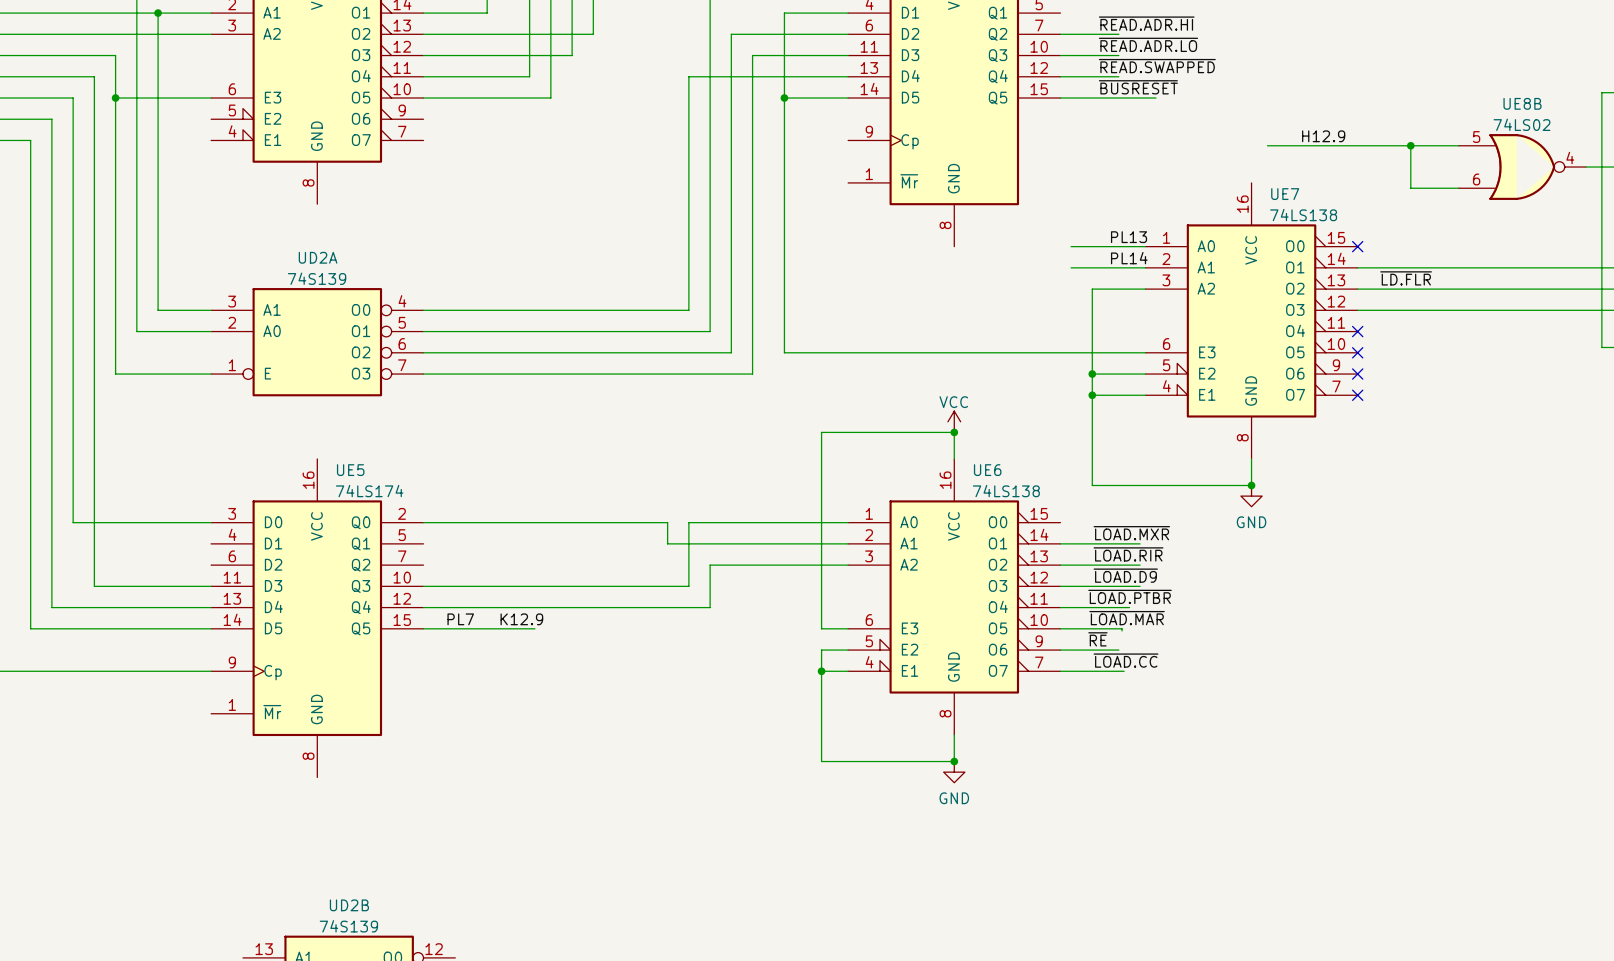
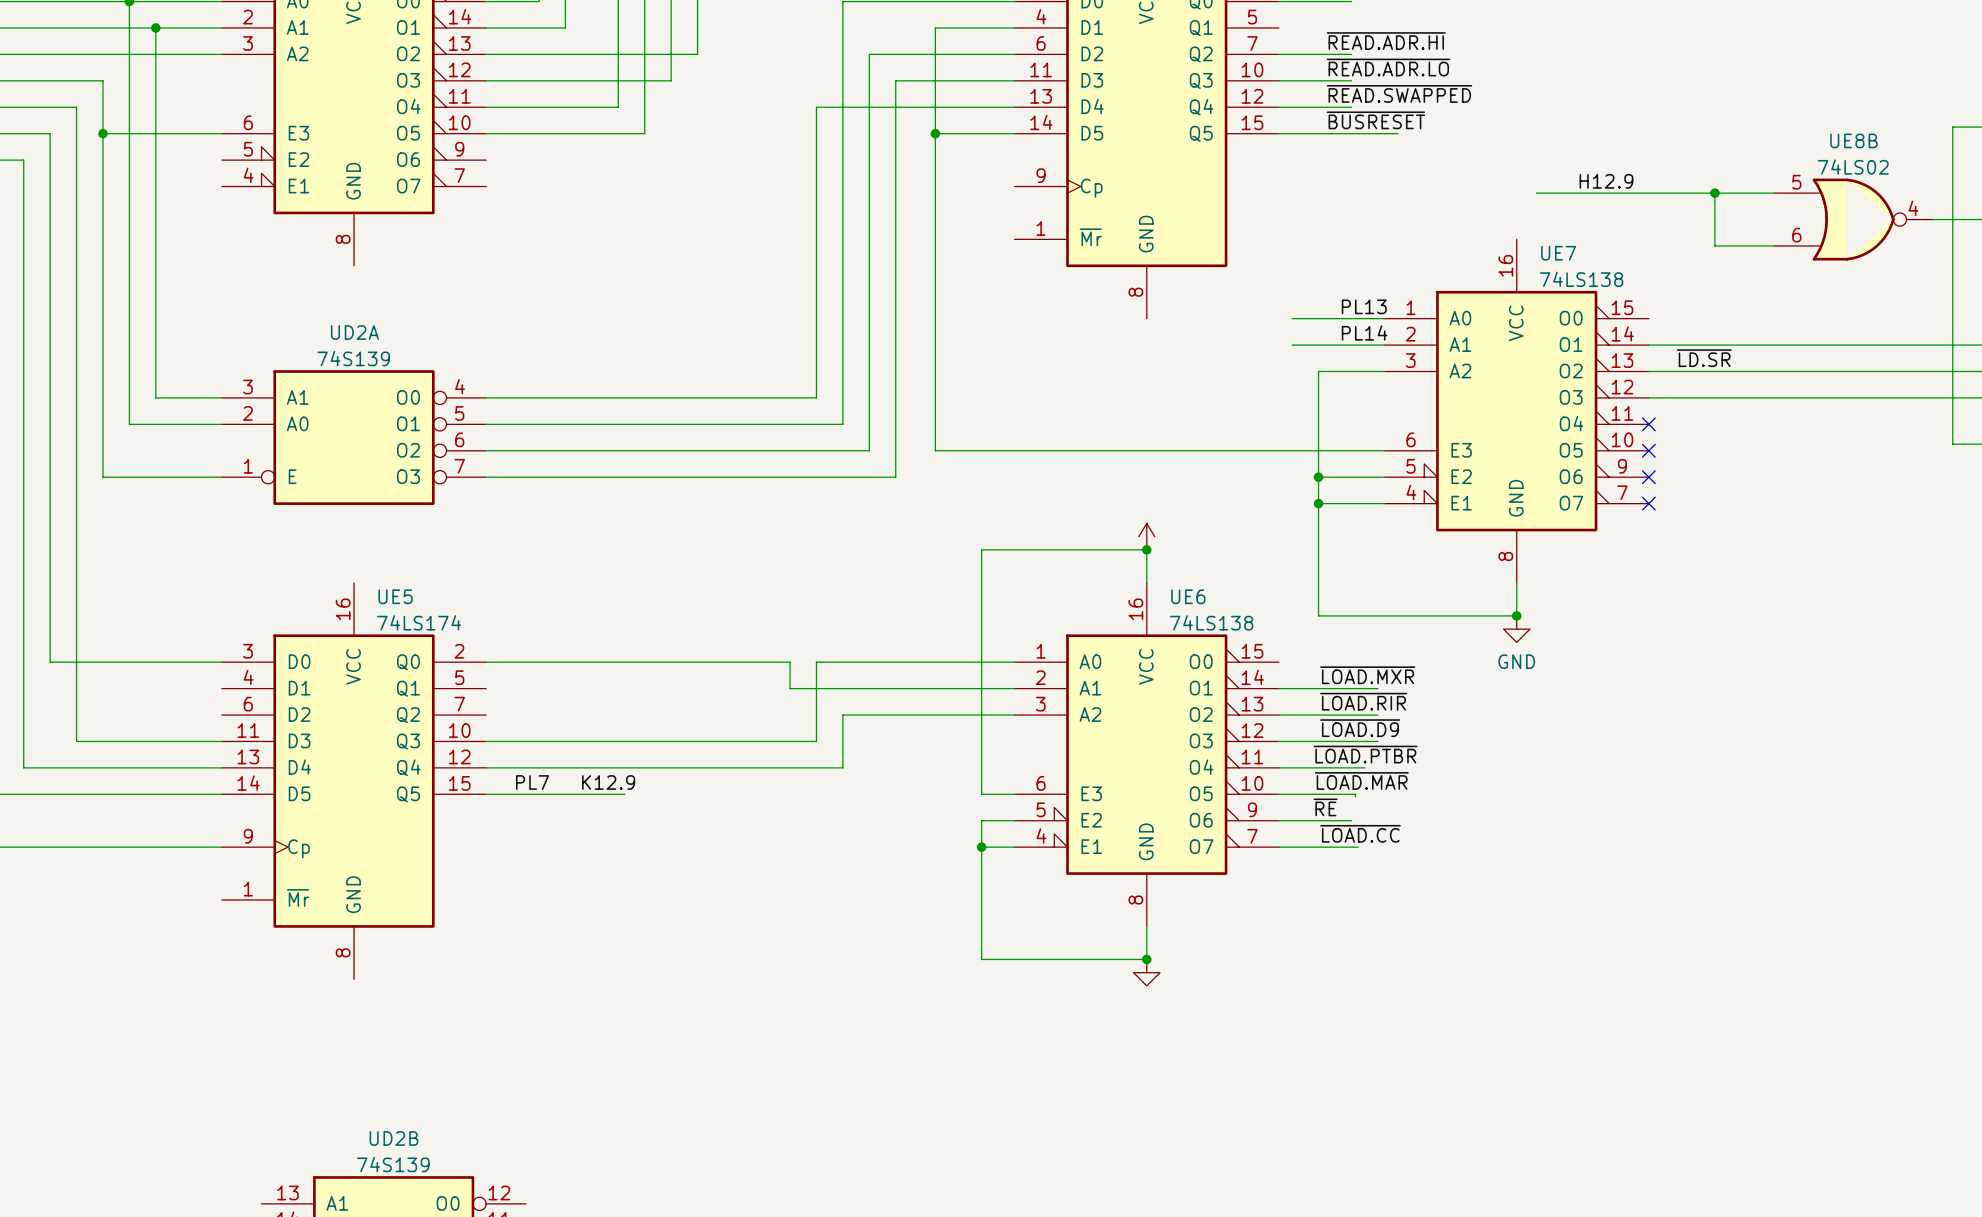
no-connect mark: (1357, 246) -> none
label: ~{LD.FLR} (1406, 278) -> ~{LD.SR} (1704, 358)
power symbol text: VCC (953, 402) -> none
power symbol text: GND (954, 798) -> none

